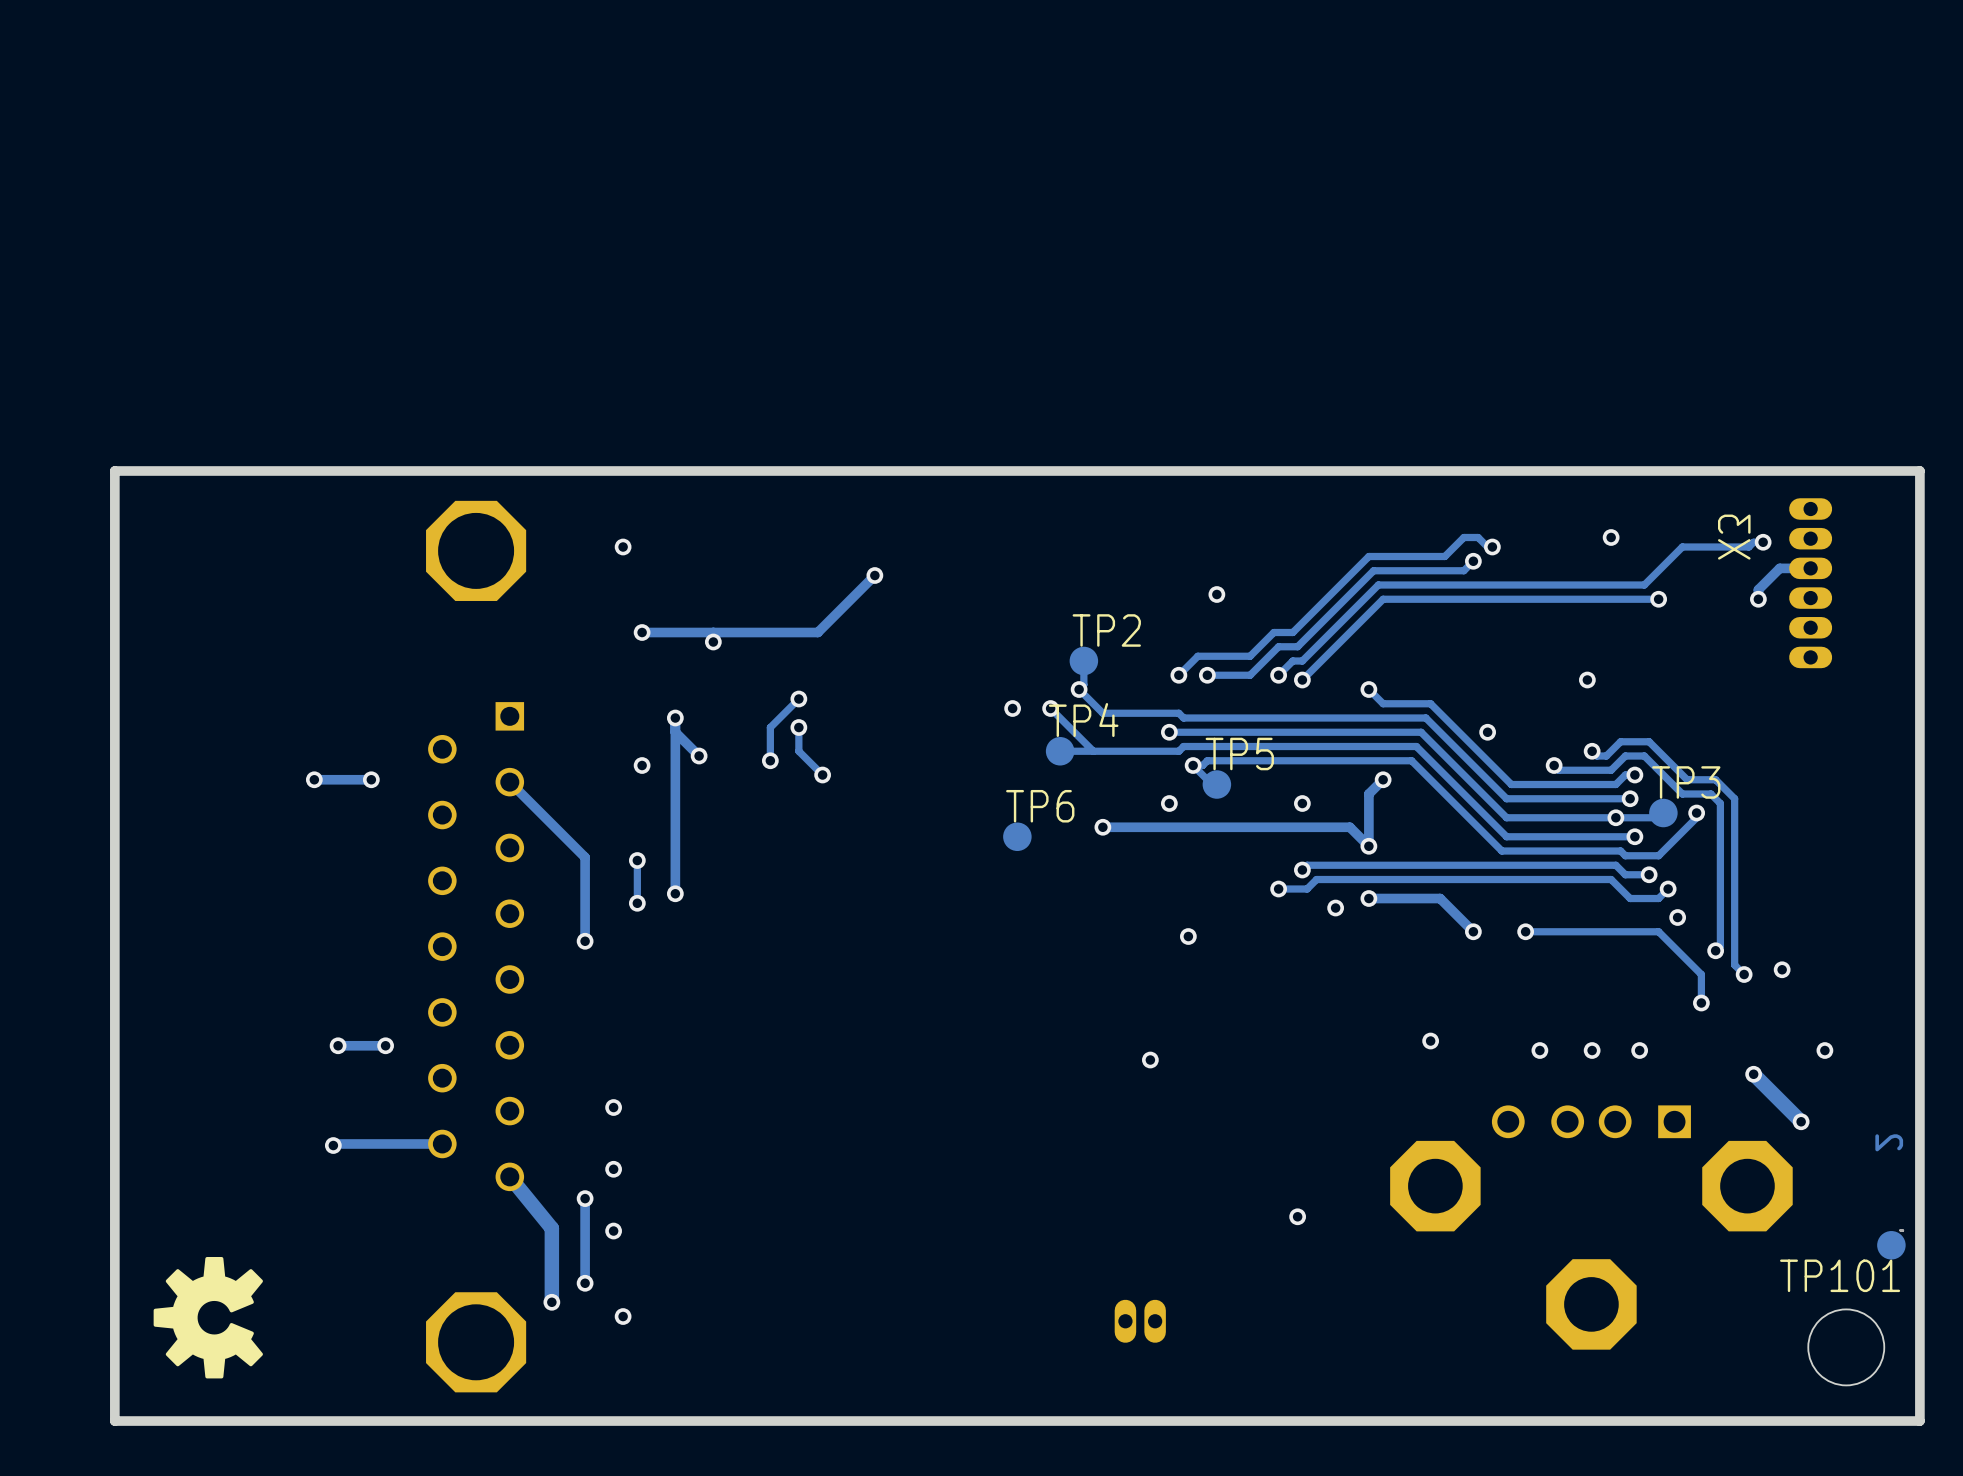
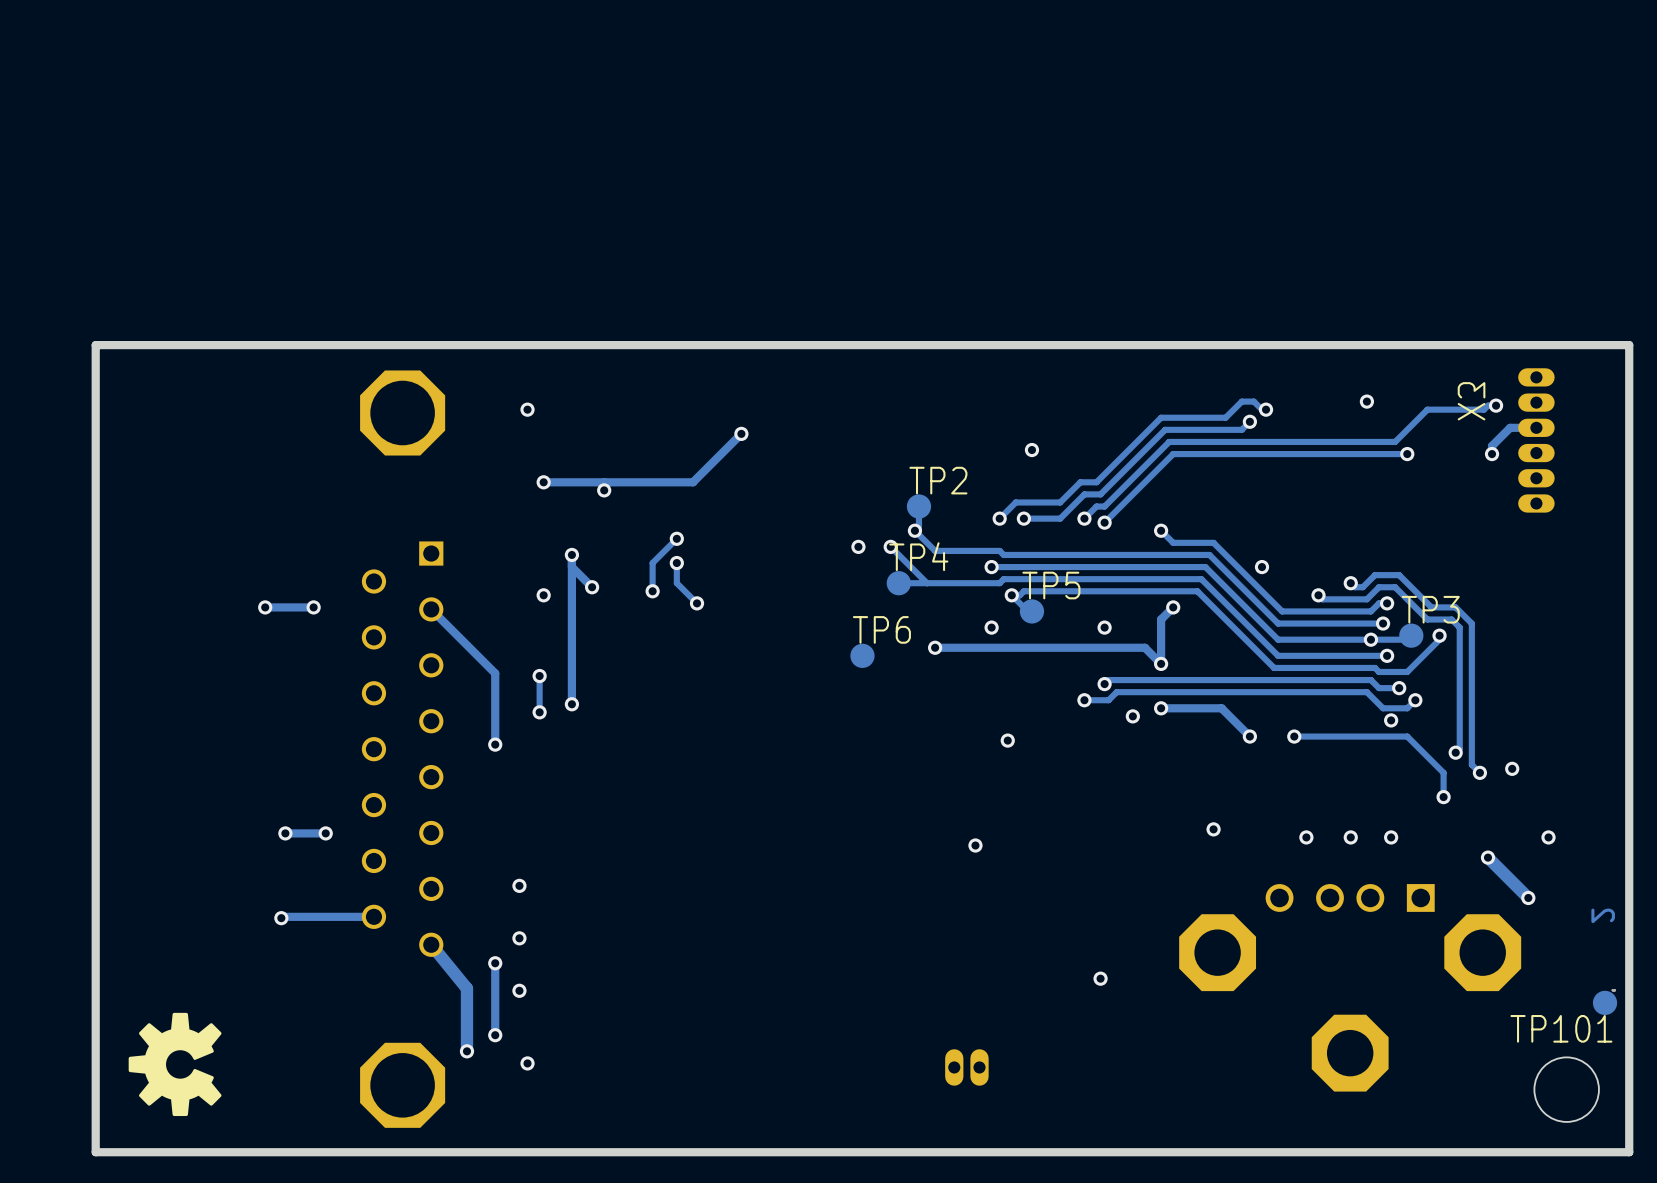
via: (1587, 680) -> none
via position: (1677, 917) -> (1391, 720)

